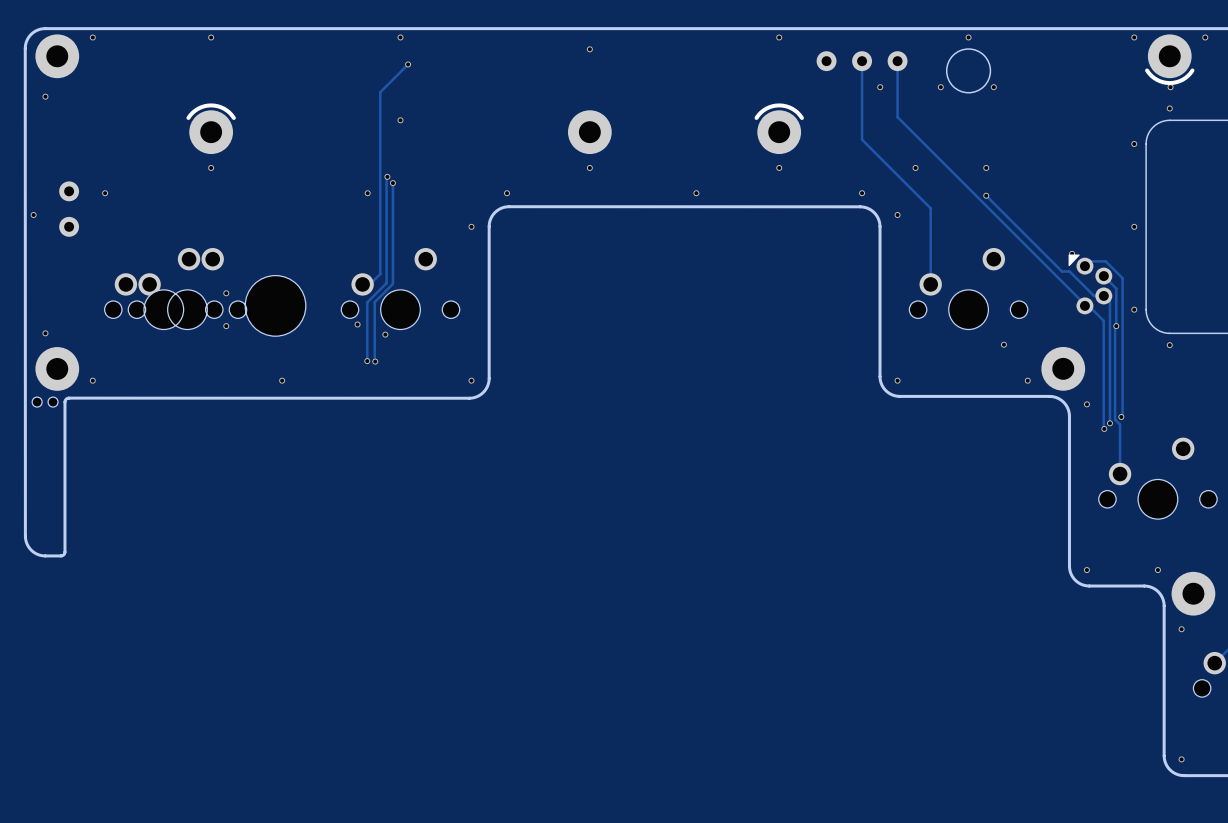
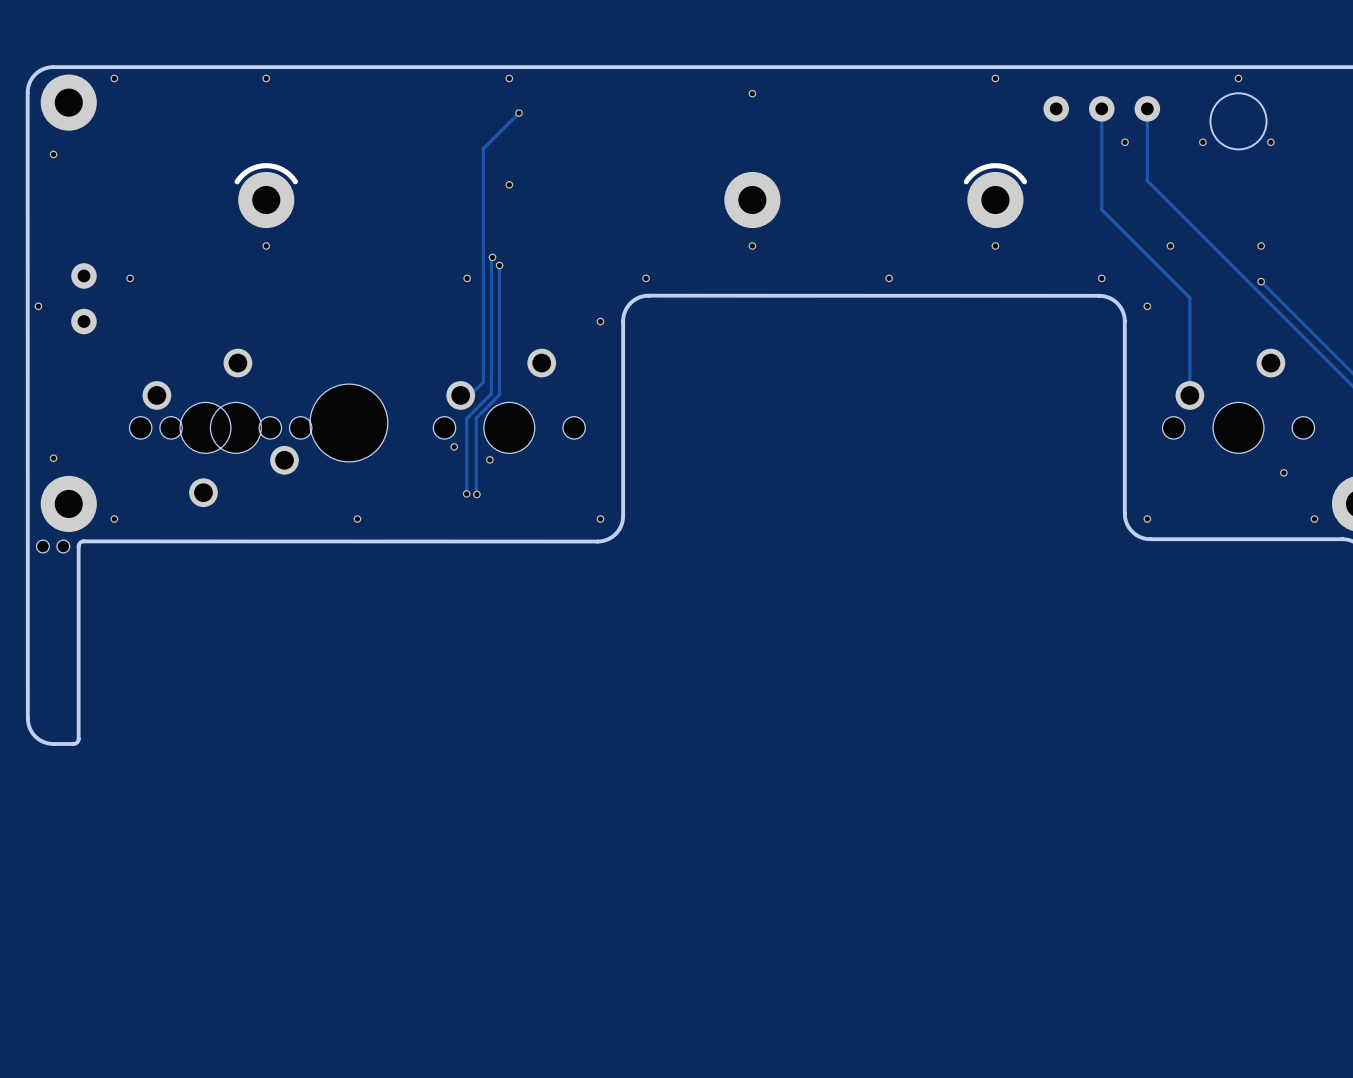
part rotation: 0° (187, 288) -> 180° (235, 454)
via: (226, 293) -> none
via: (226, 326) -> none

